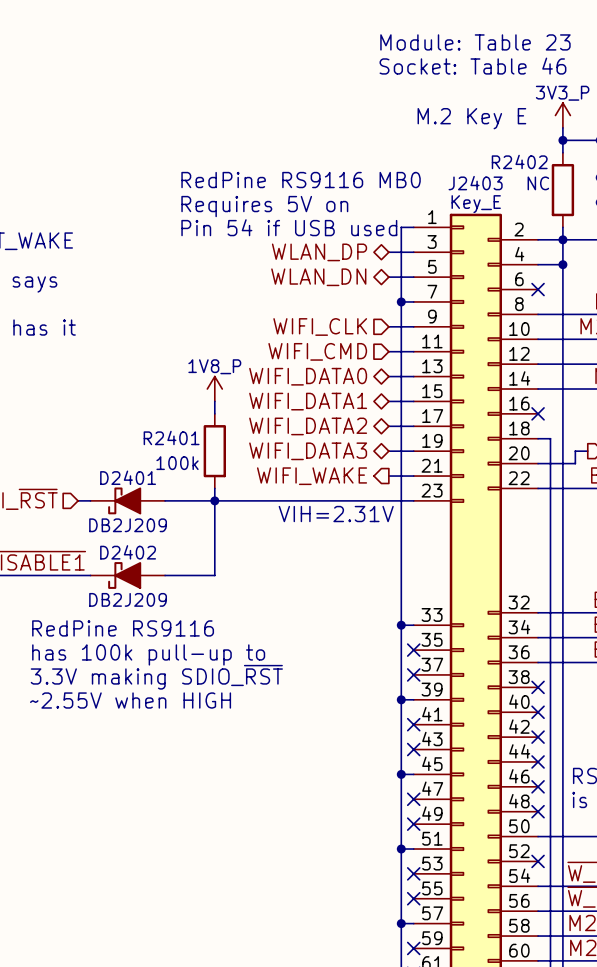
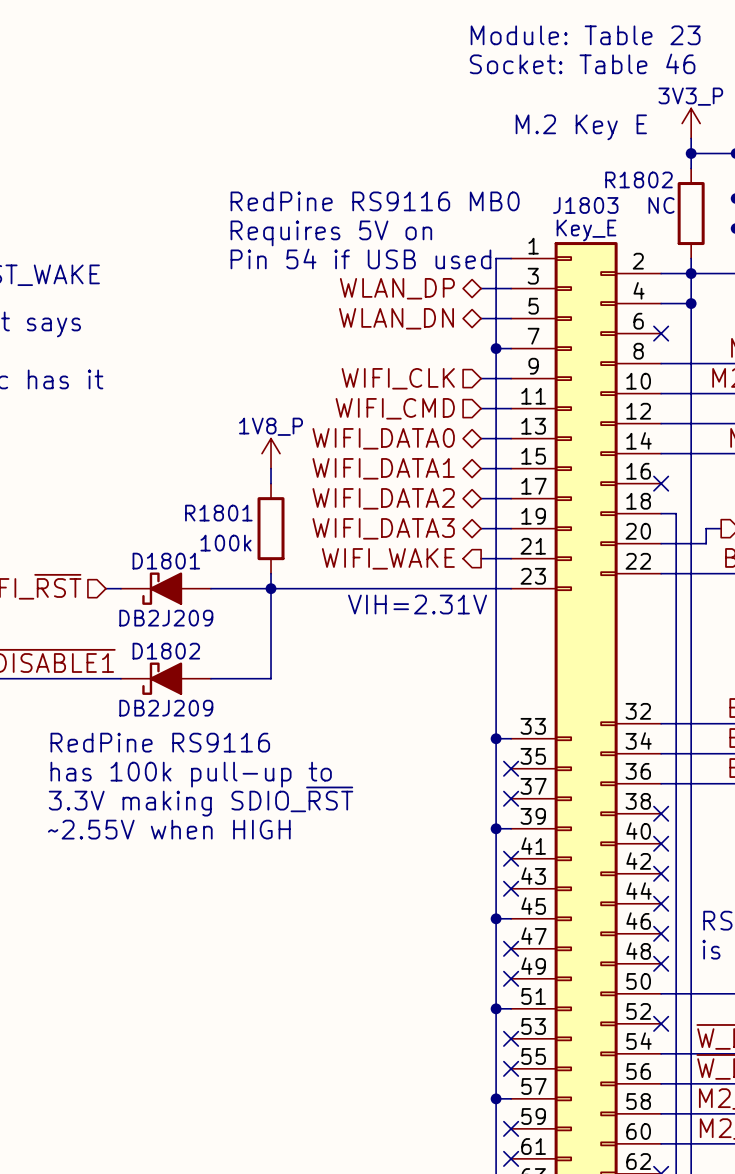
R2402 name: R2402 (519, 161) -> R1802 (639, 179)
J2403 name: J2403 (475, 183) -> J1803 (585, 205)
R2401 name: R2401 (171, 437) -> R1801 (218, 513)
D2401 name: D2401 (128, 477) -> D1801 (166, 561)
D2402 name: D2402 (128, 552) -> D1802 (166, 651)

